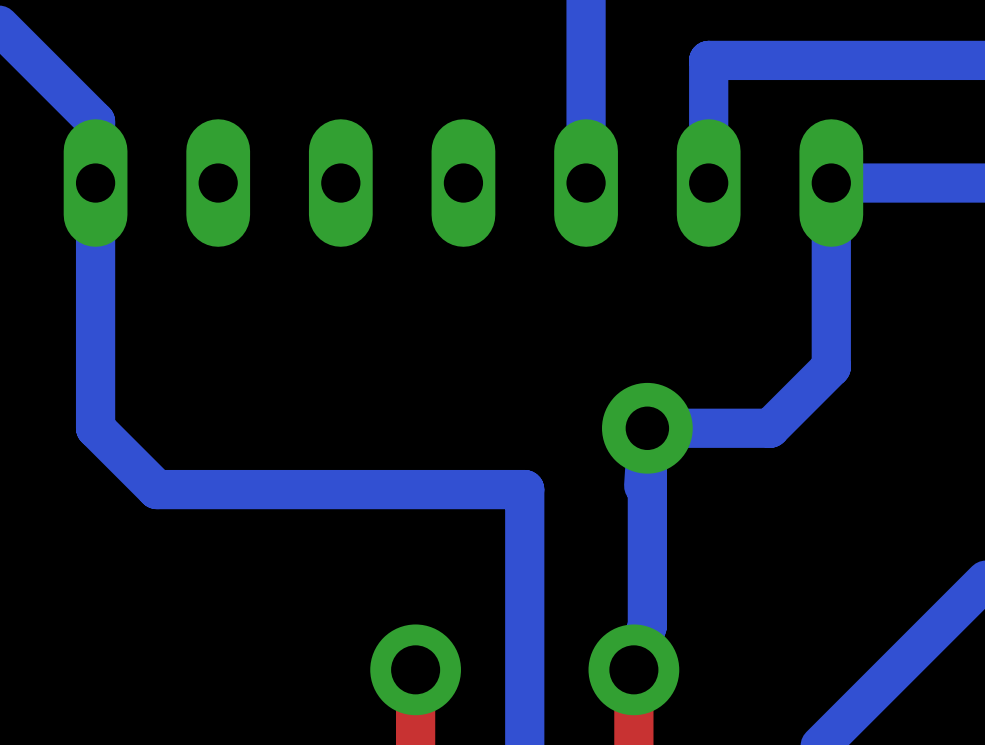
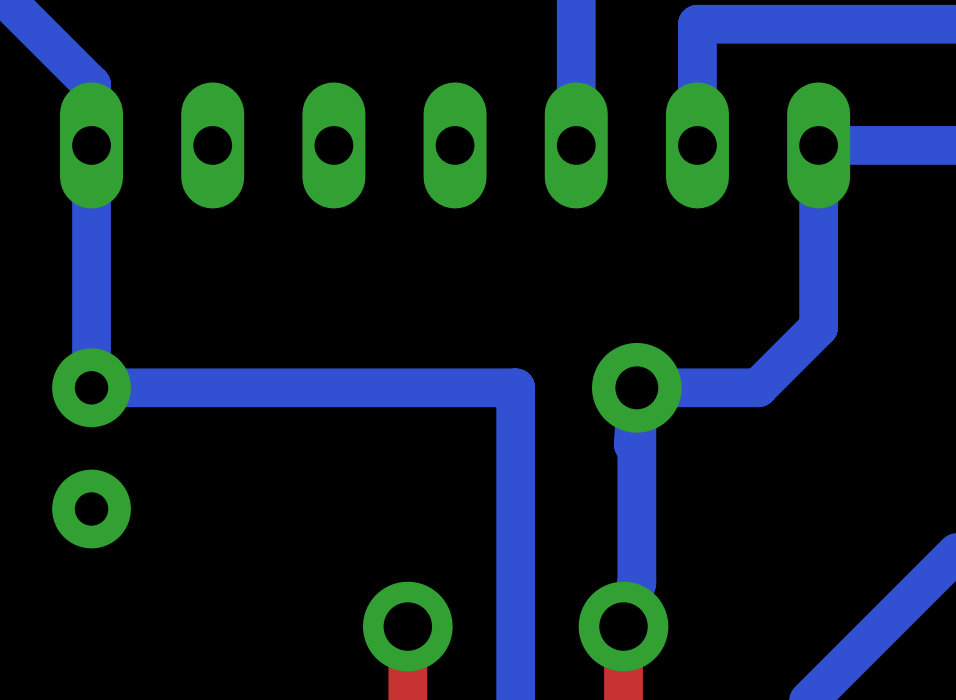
bottom track: (95, 428) (156, 489) (524, 489) -> (91, 387) (515, 387) (515, 448)
part: none -> (91, 448)

